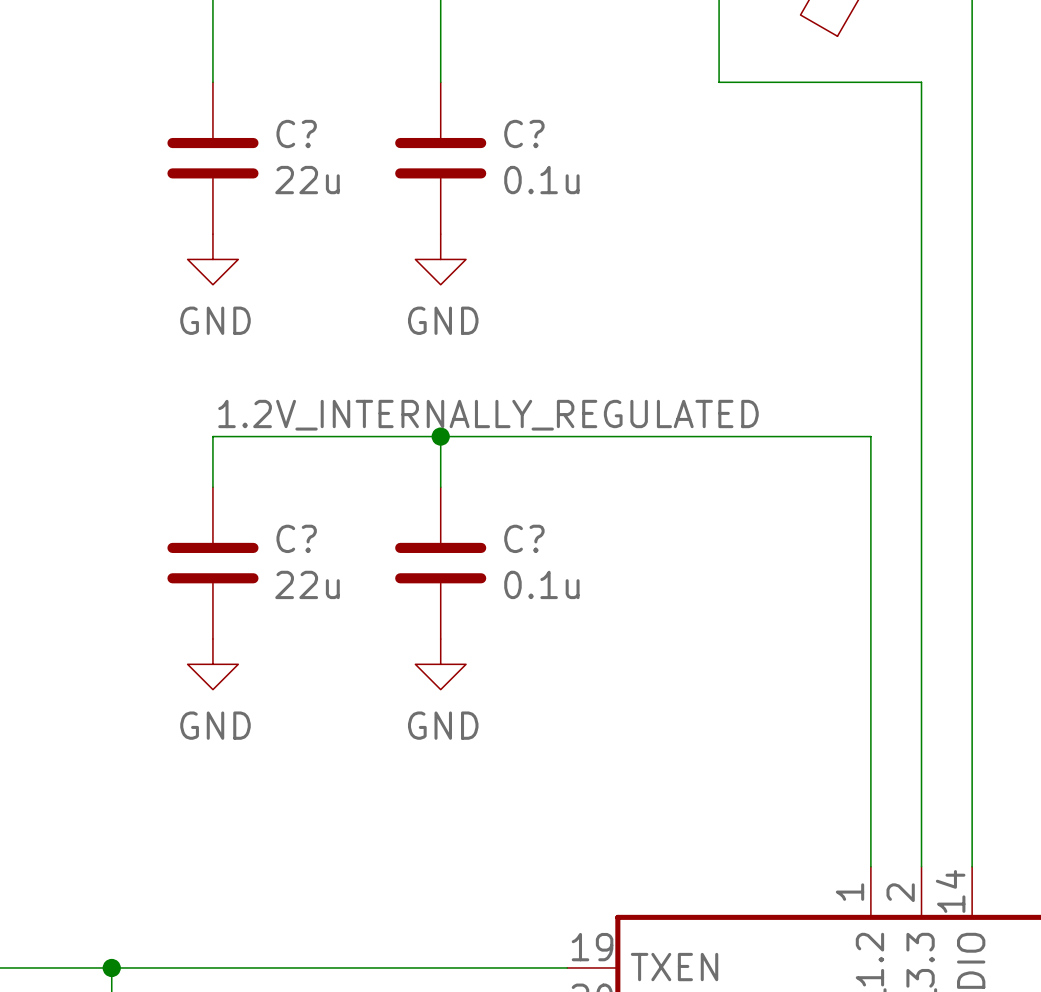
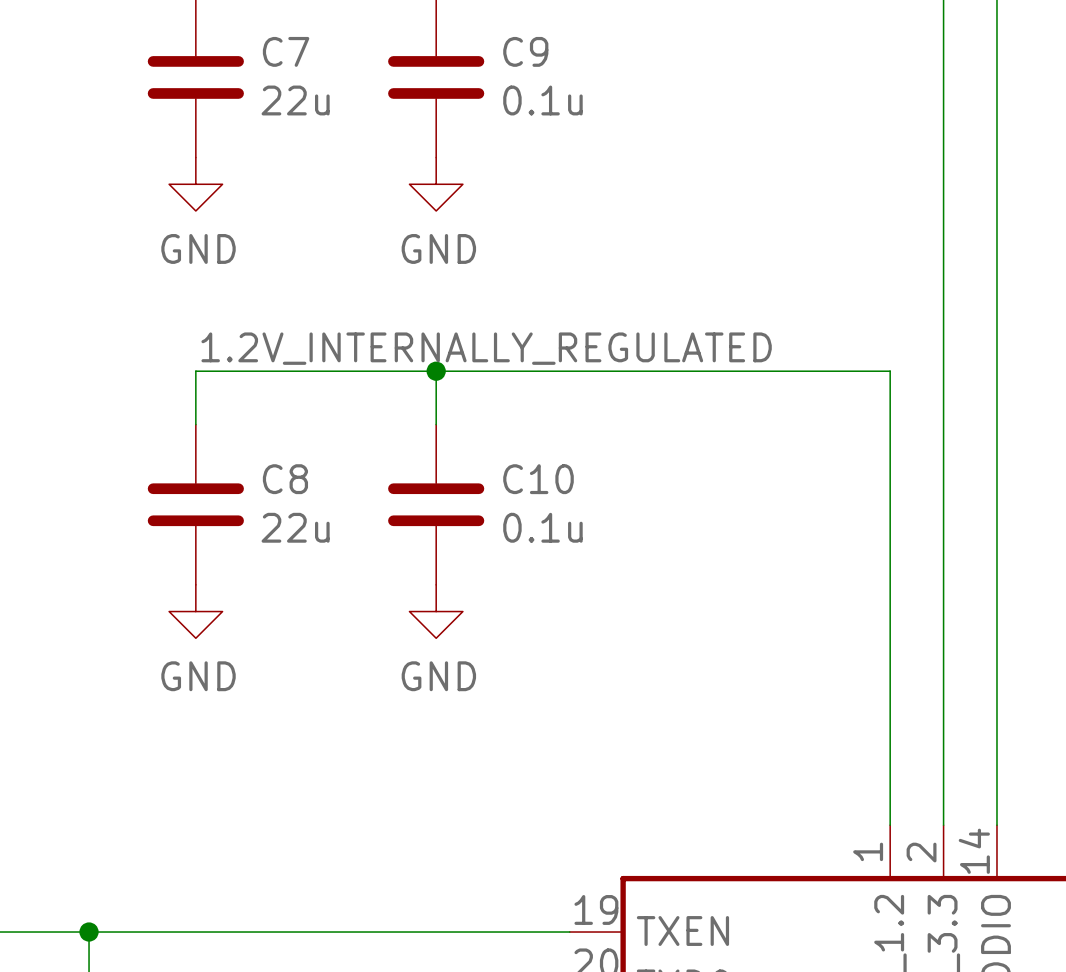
C? name: C? (296, 133) -> C7 (286, 51)
C? name: C? (524, 133) -> C9 (525, 51)
C? name: C? (296, 538) -> C8 (285, 479)
C? name: C? (524, 538) -> C10 (538, 479)

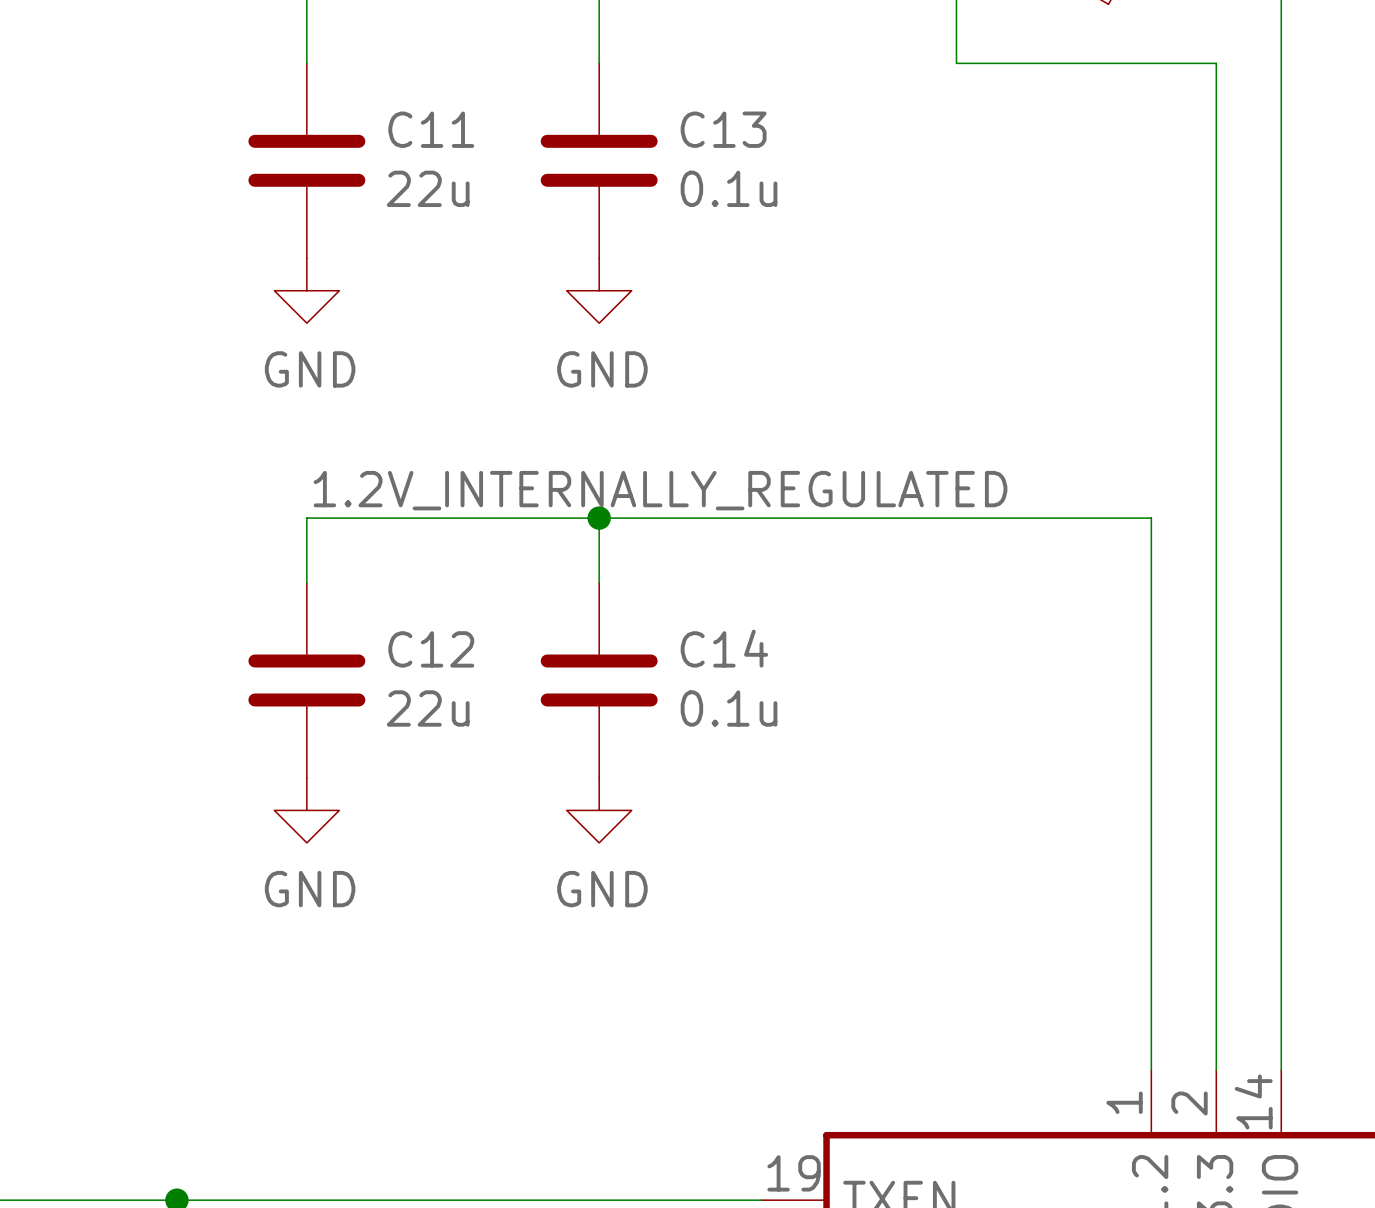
C7 name: C7 (286, 51) -> C11 (431, 129)
C9 name: C9 (525, 51) -> C13 (723, 129)
C8 name: C8 (285, 479) -> C12 (431, 649)
C10 name: C10 (538, 479) -> C14 (724, 648)

